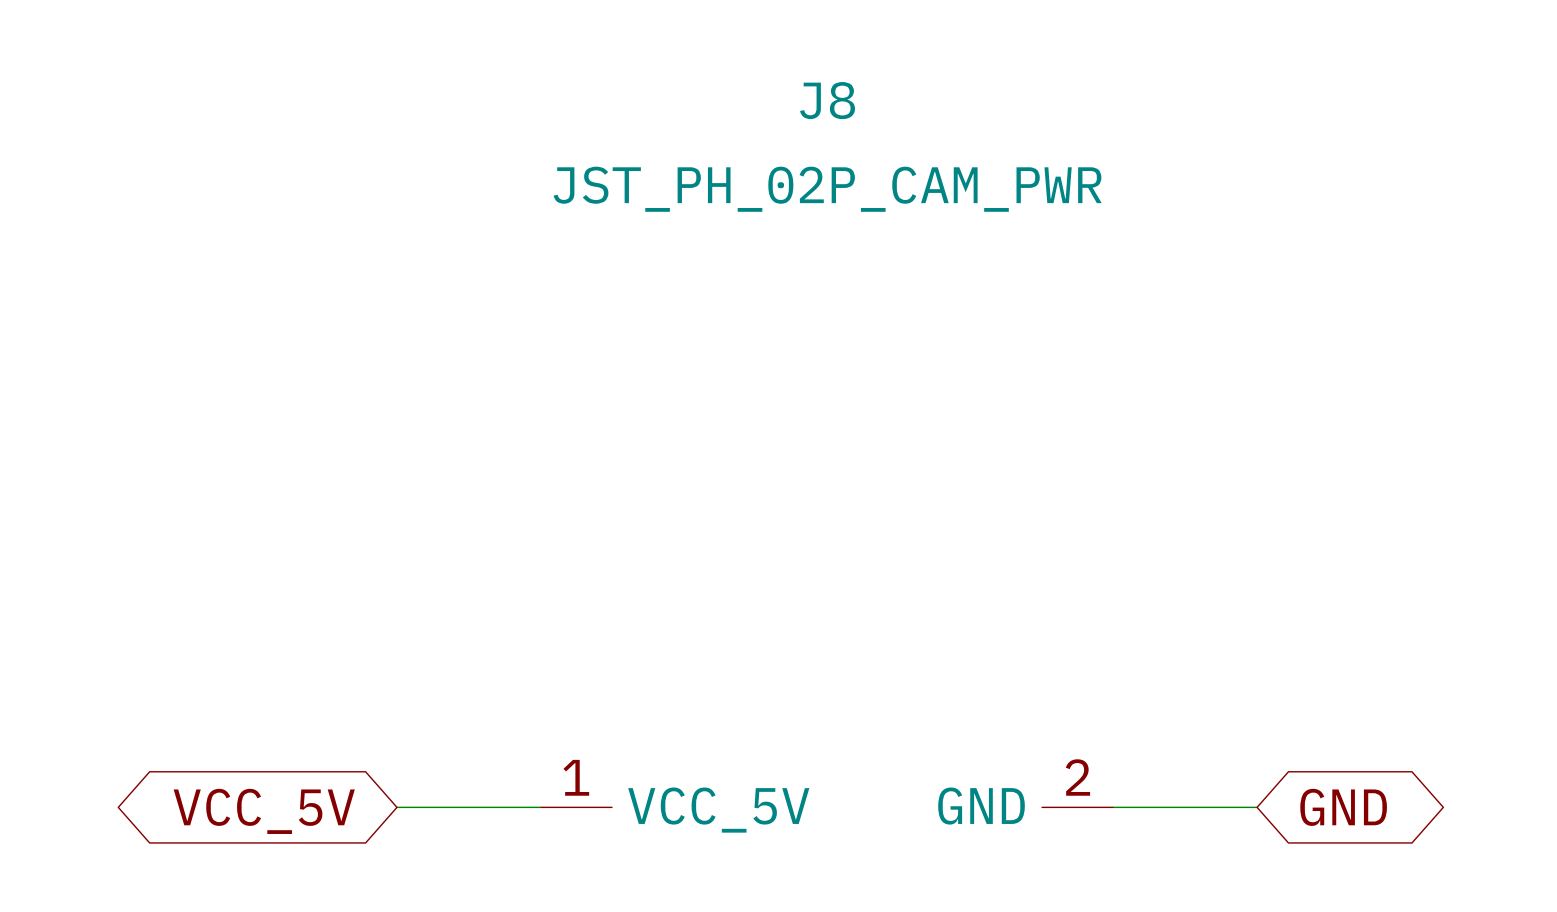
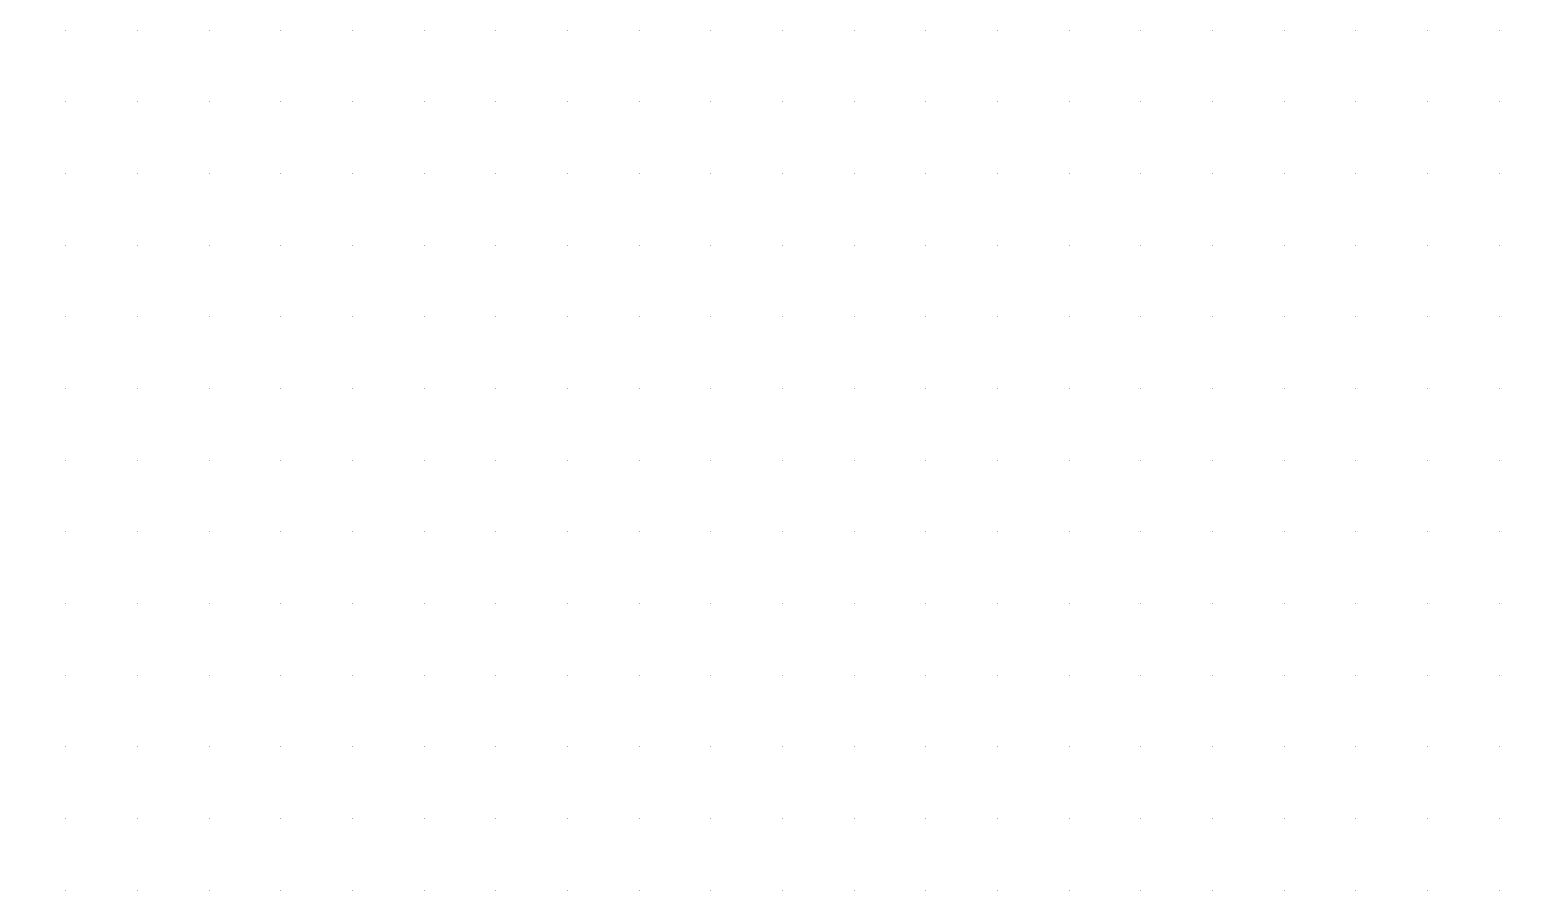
wire: (396, 807) (540, 807) -> none
J8: JST_PH_02P_CAM_PWR (827, 807) -> none
wire: (1113, 807) (1257, 807) -> none
global label: GND (1343, 807) -> none
global label: VCC_5V (264, 811) -> none

